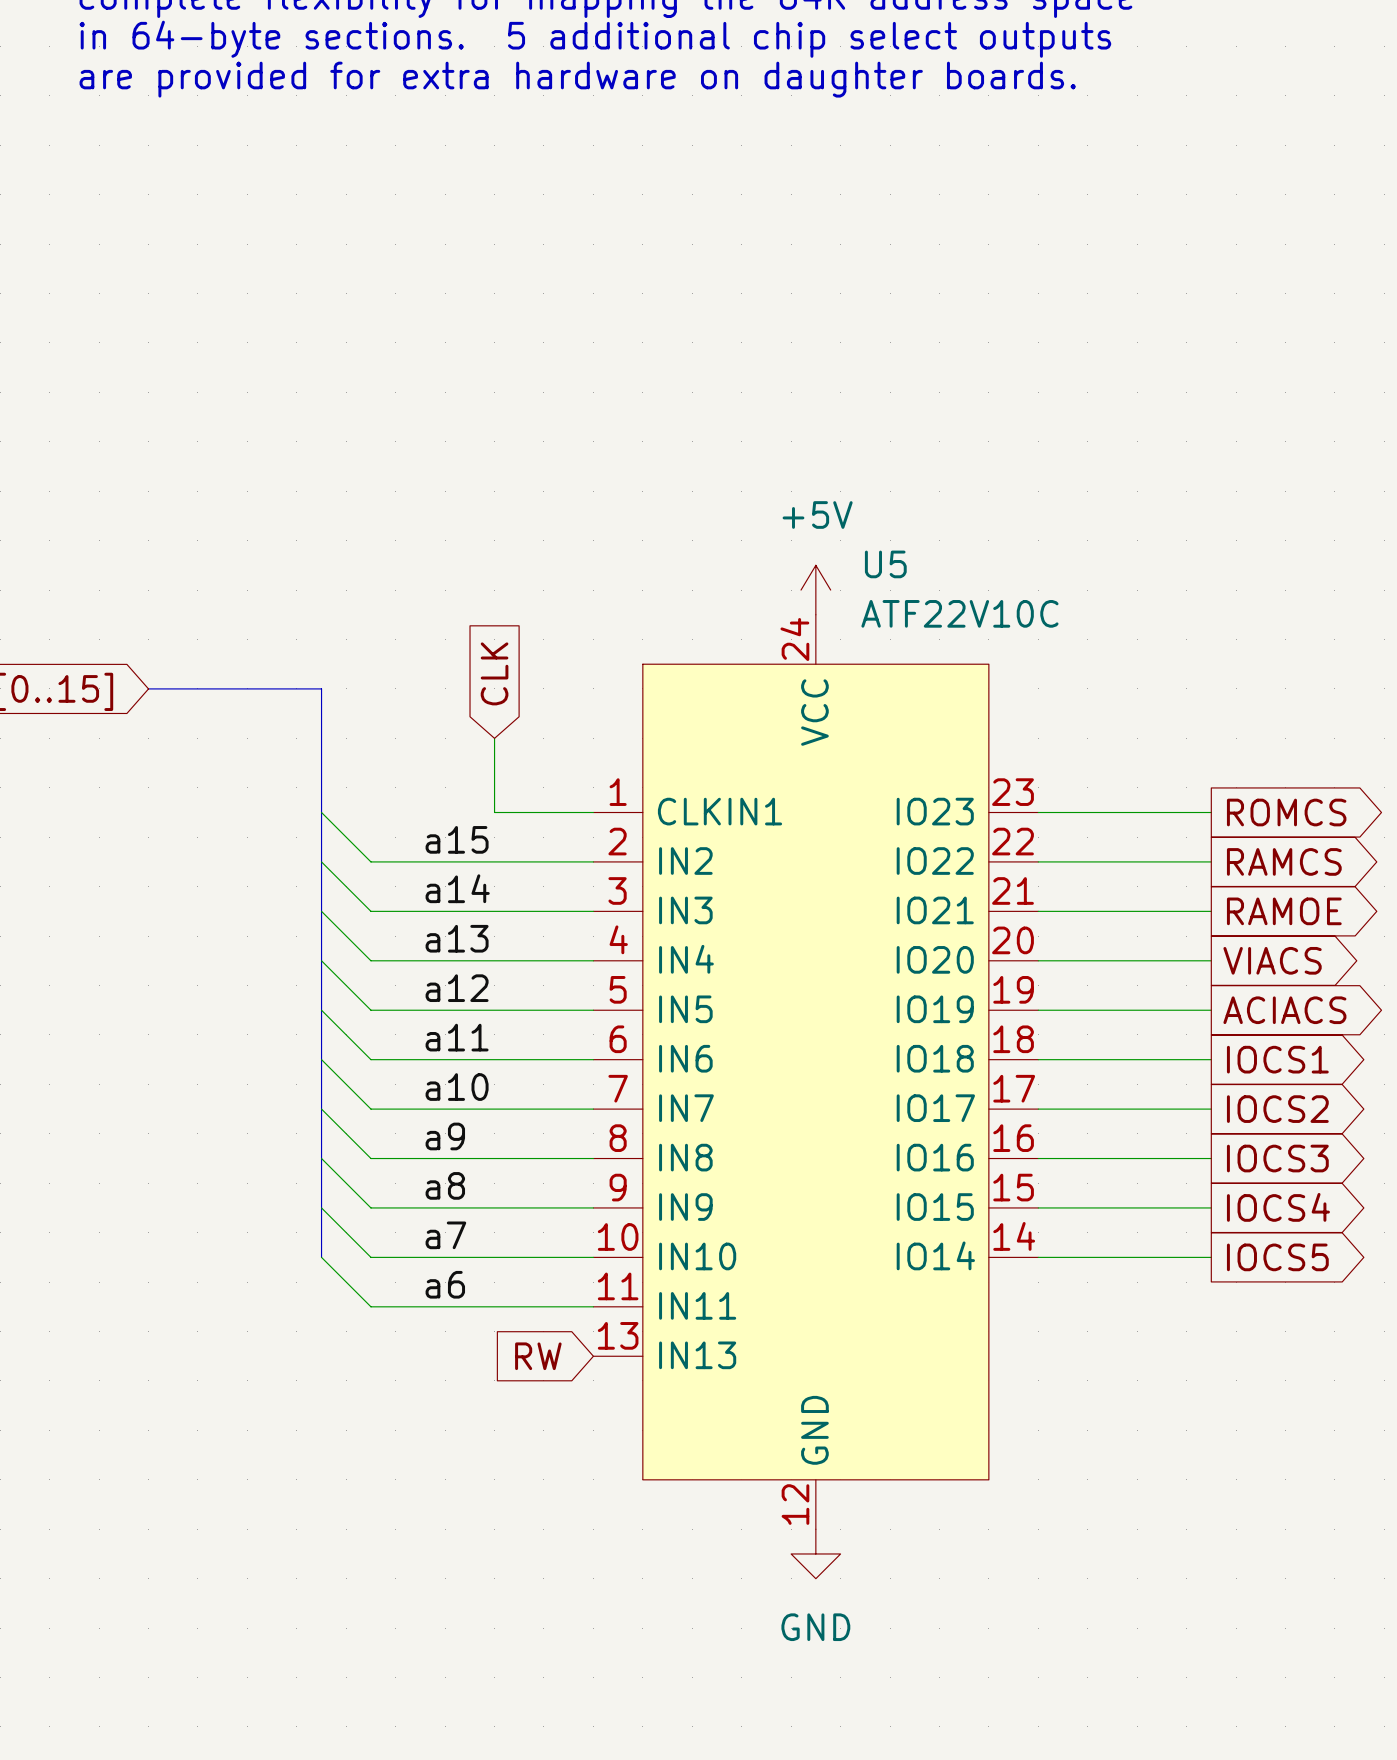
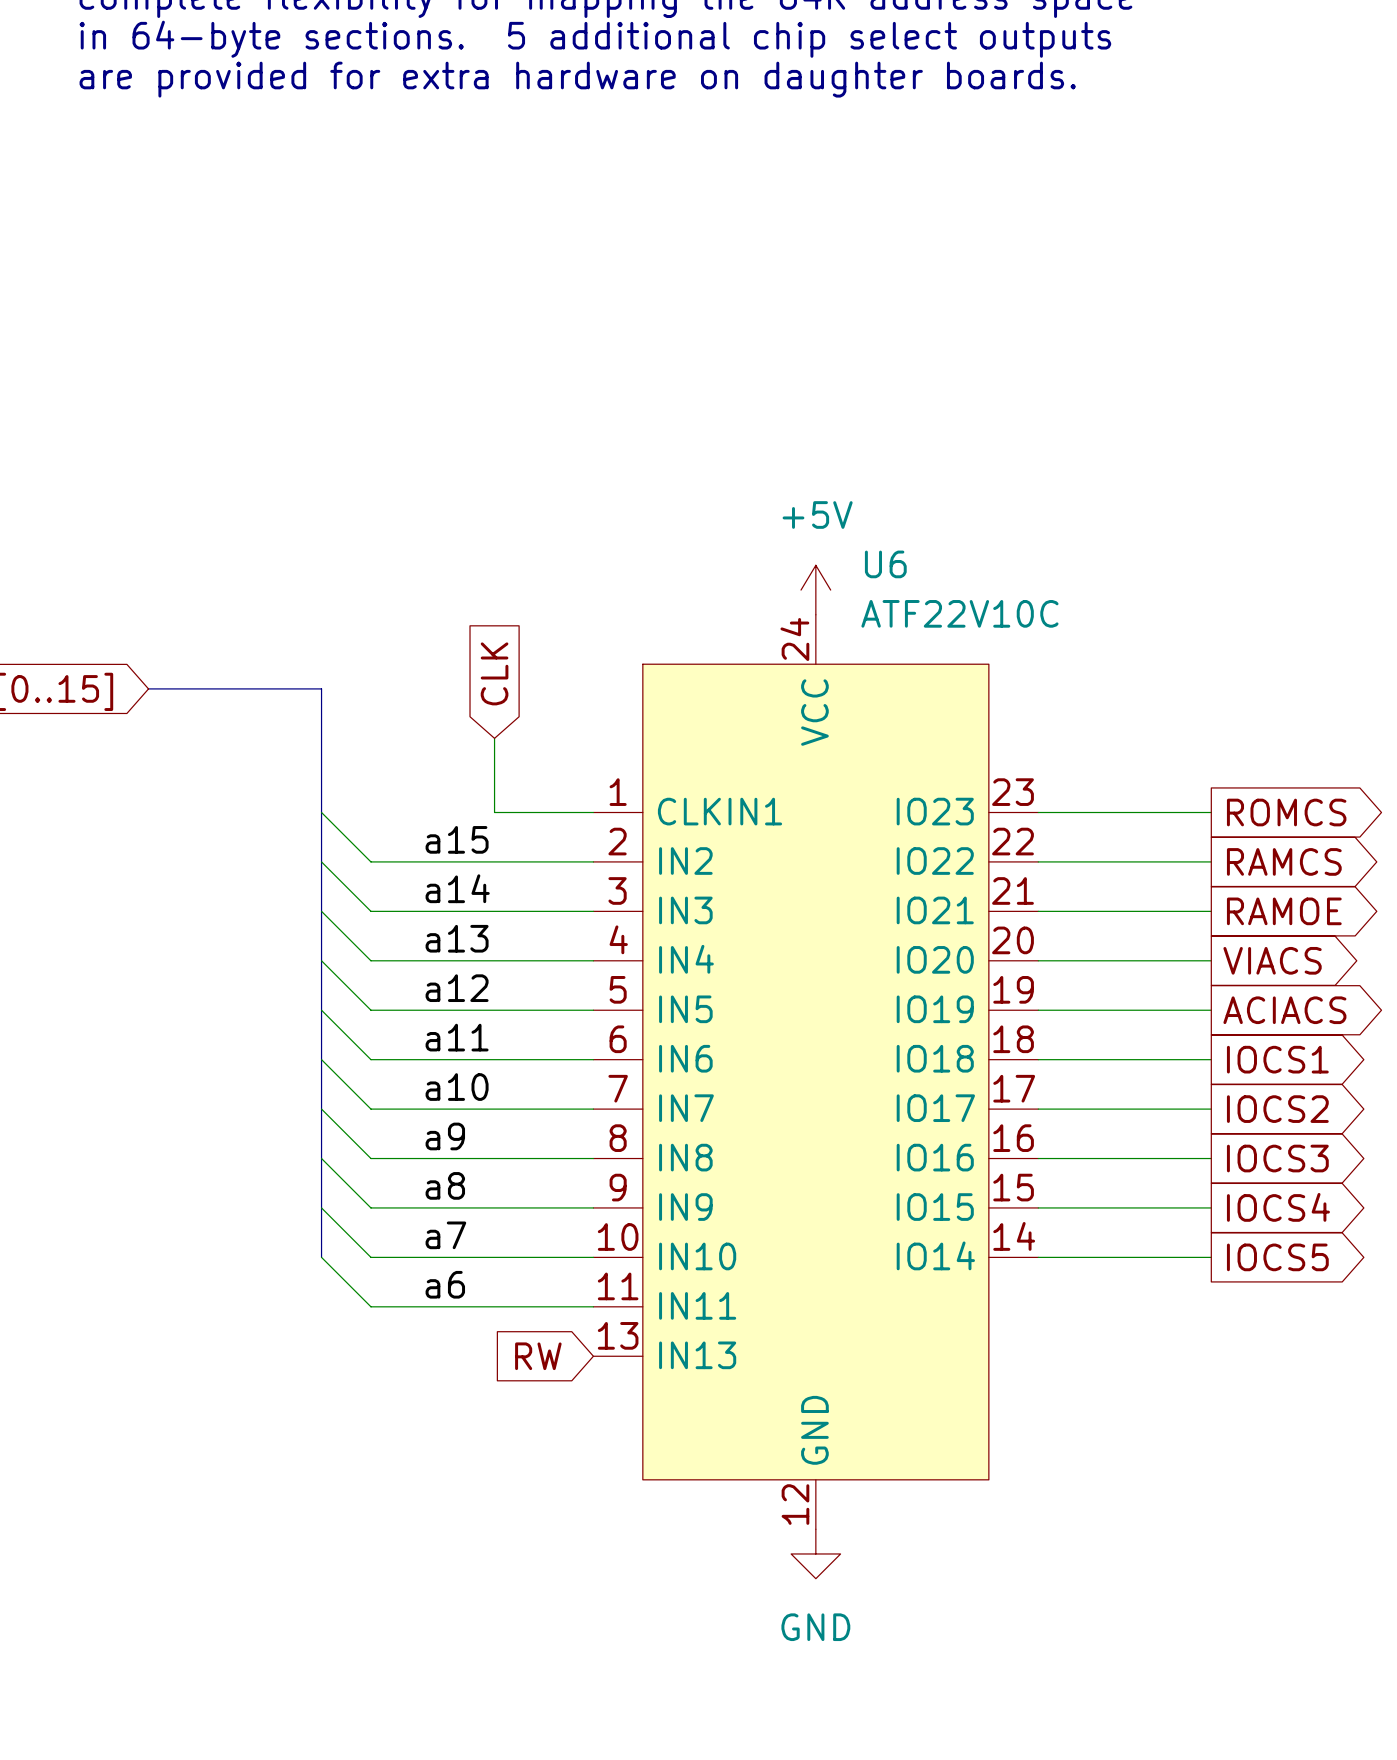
U5 name: U5 (885, 564) -> U6 (885, 564)

